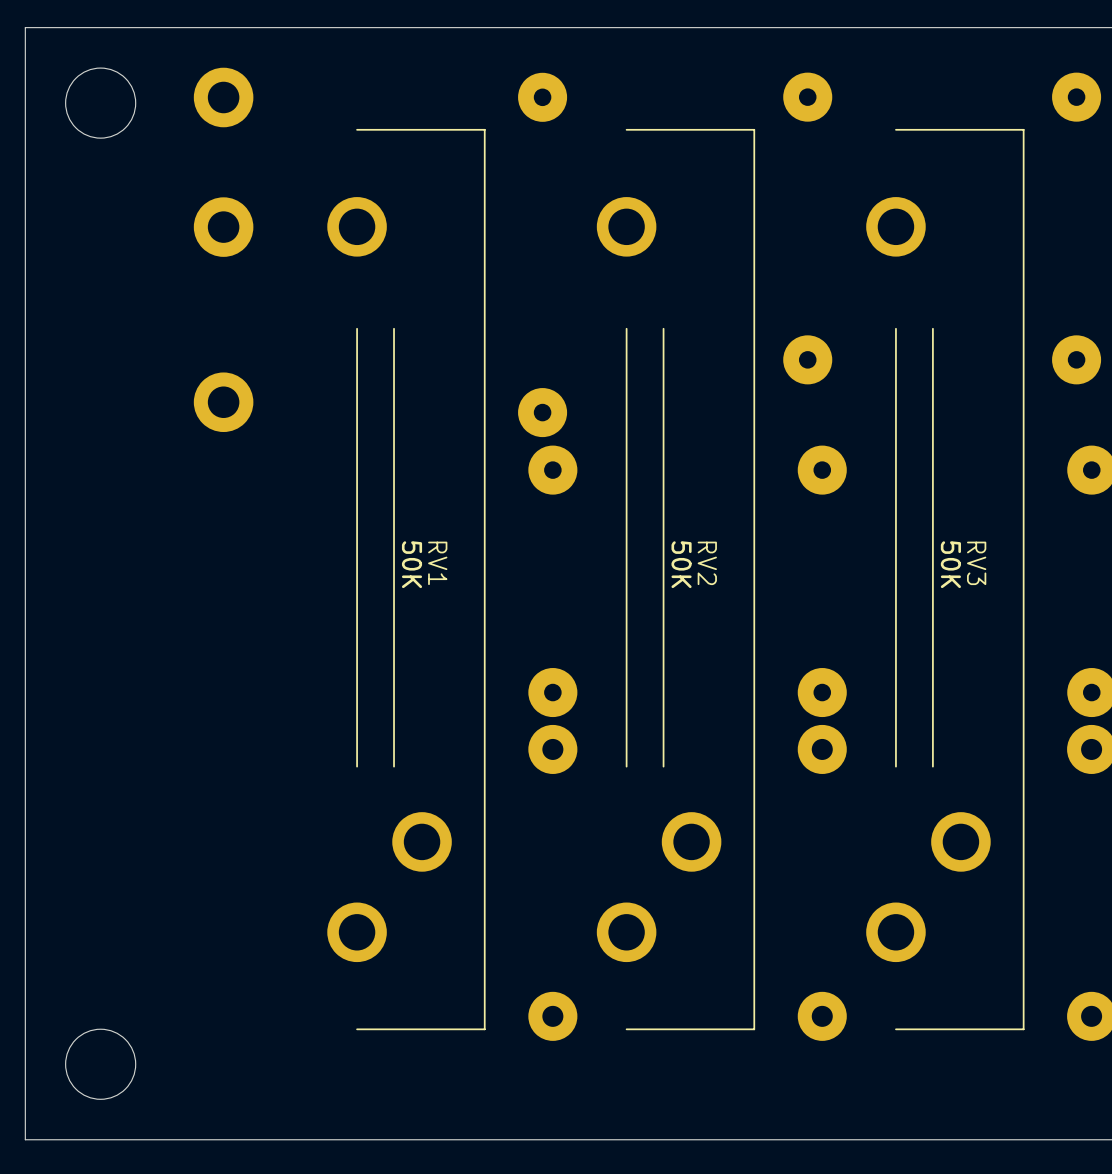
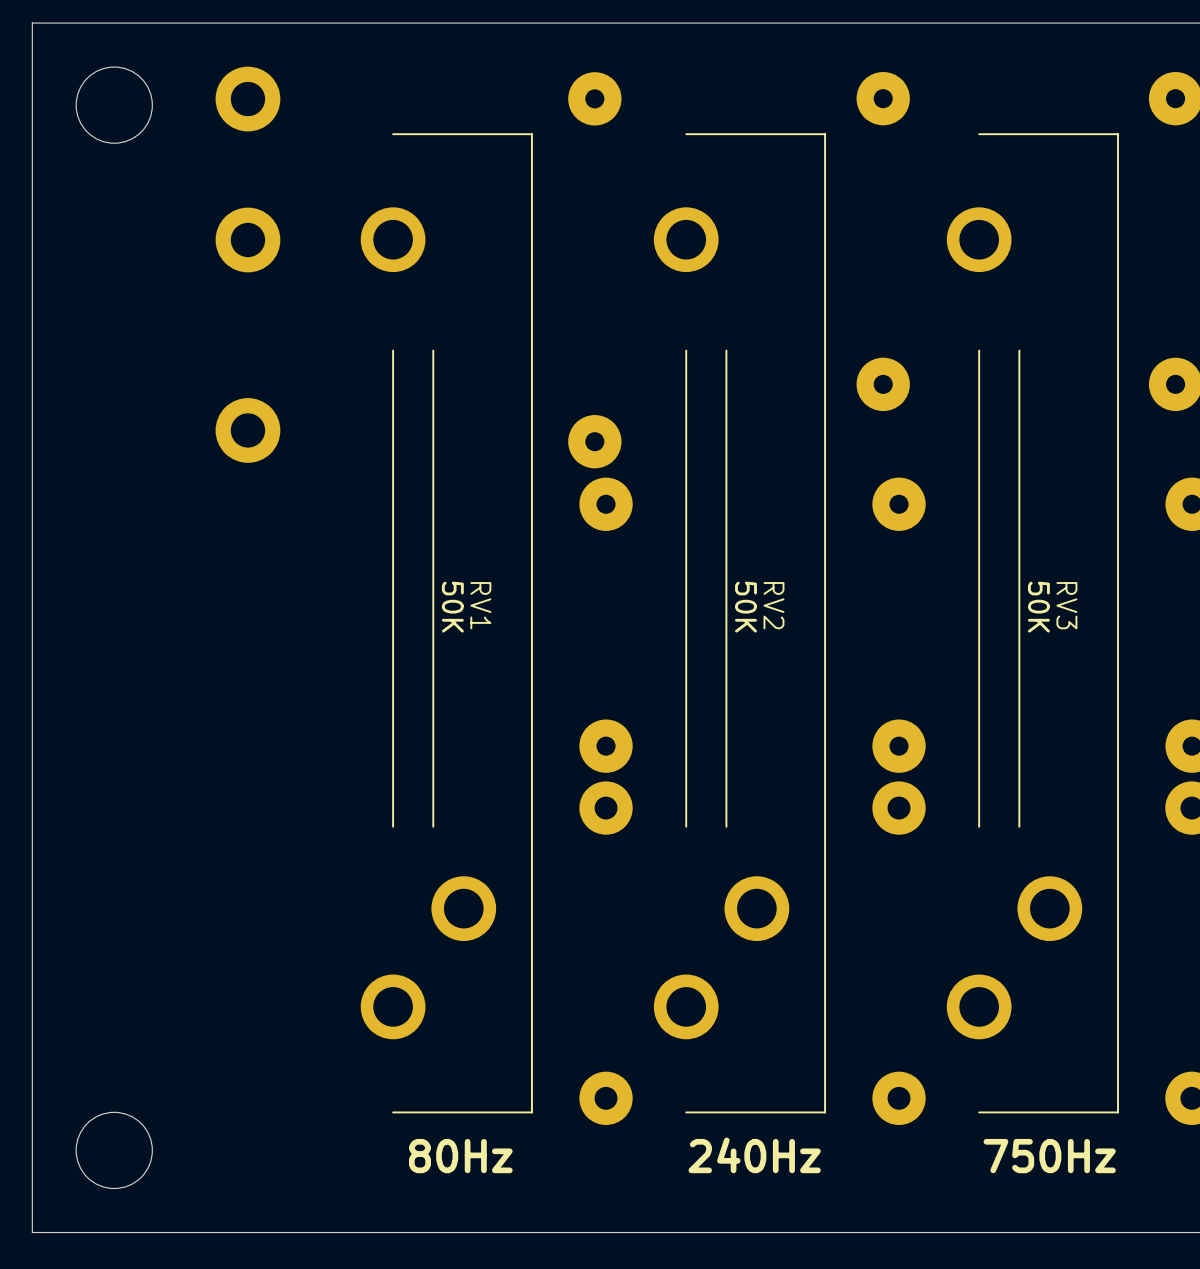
text: none -> 240Hz (754, 1155)
text: none -> 80Hz (460, 1156)
text: none -> 750Hz (1049, 1156)

